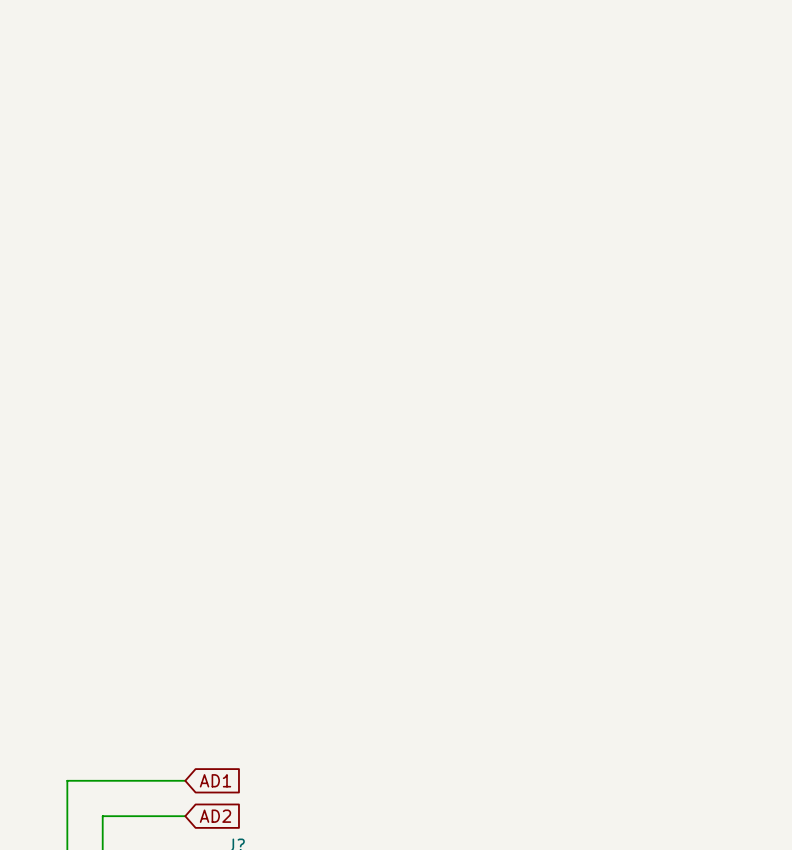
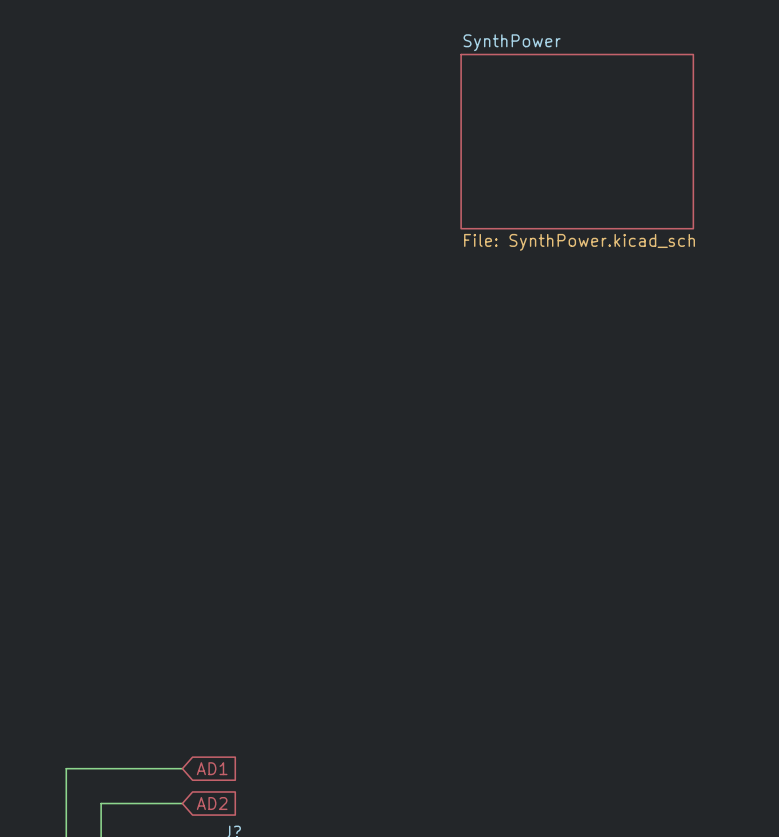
sheet SynthPower: none -> File: SynthPower.kicad_sch (577, 141)

